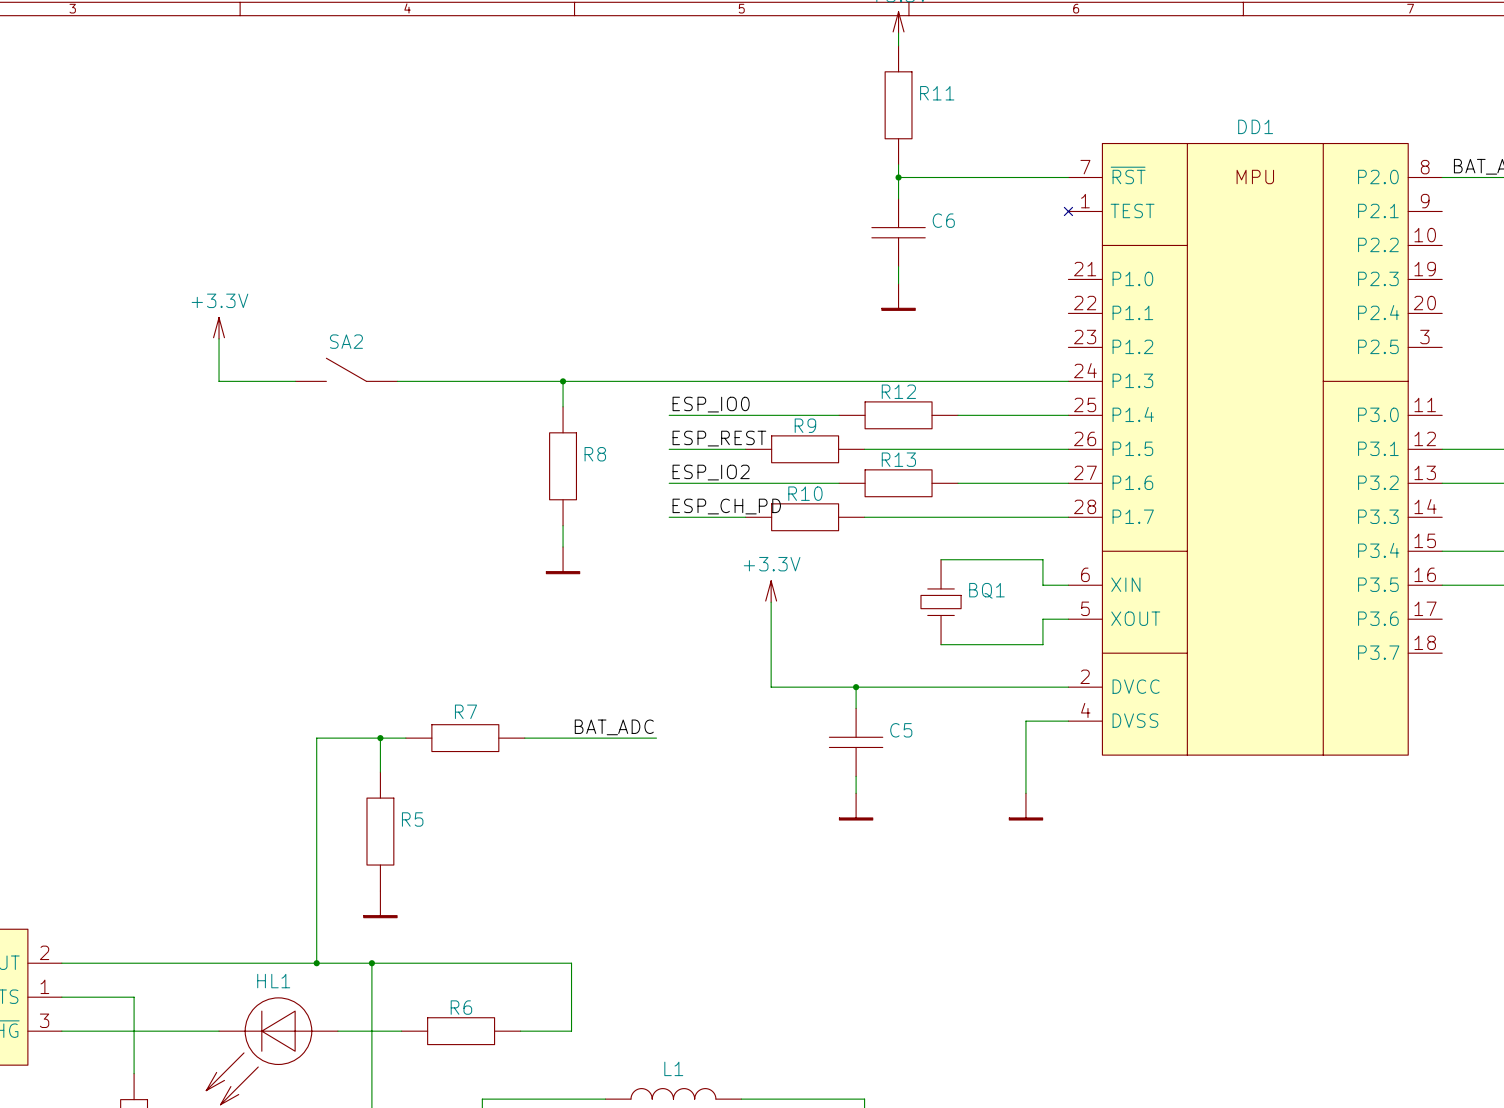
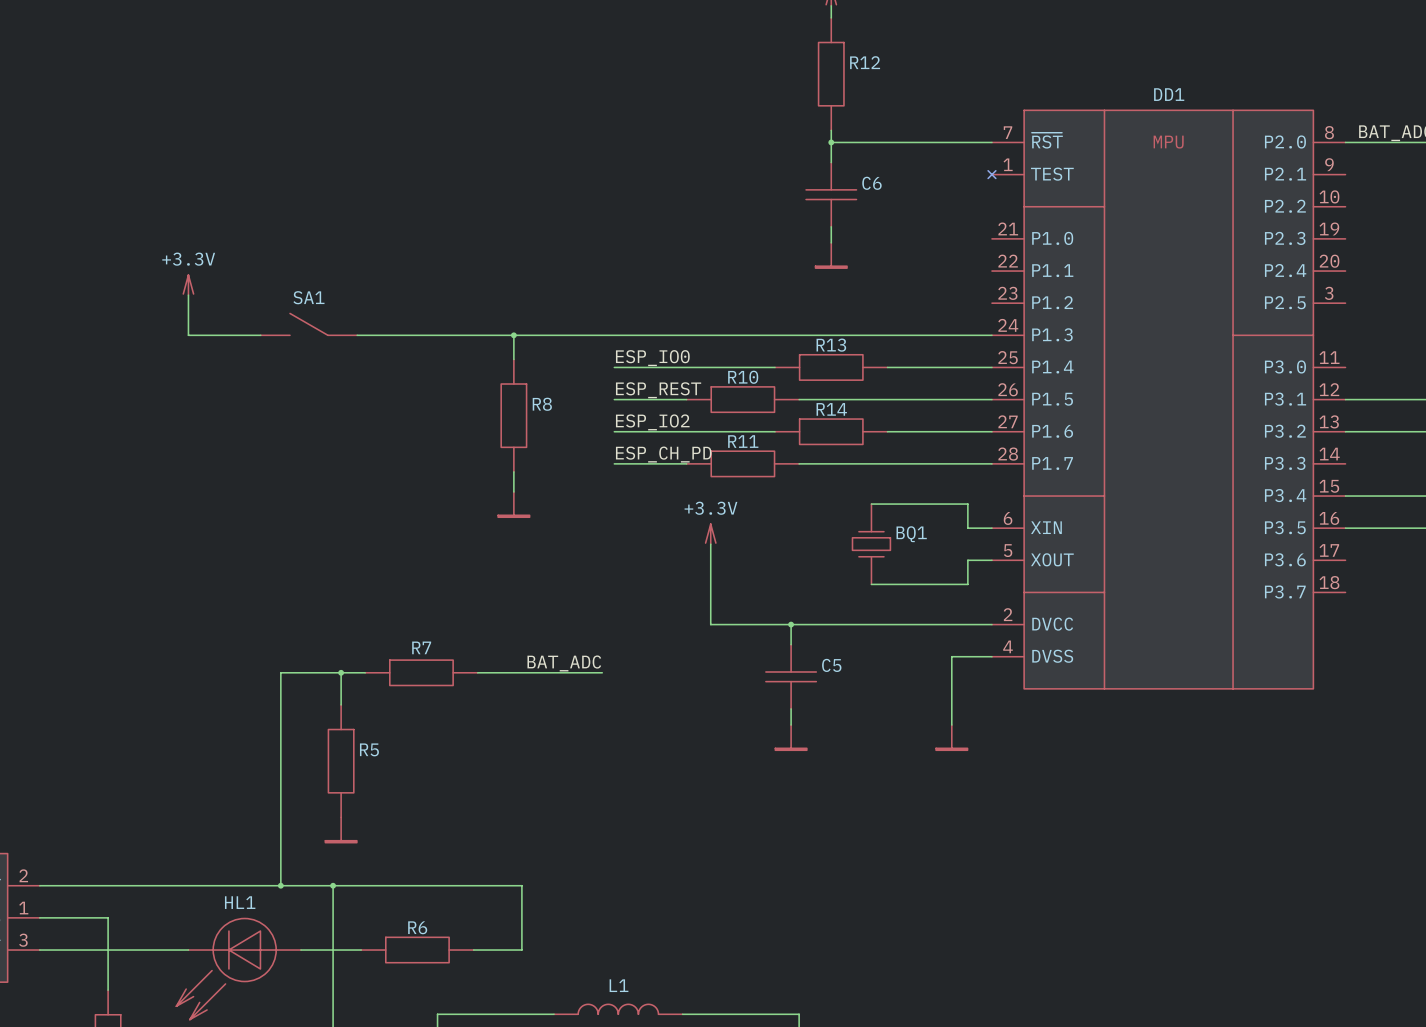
R11 name: R11 (937, 93) -> R12 (865, 62)
SA2 name: SA2 (346, 341) -> SA1 (308, 297)
R12 name: R12 (898, 391) -> R13 (831, 345)
R9 name: R9 (805, 425) -> R10 (743, 377)
R13 name: R13 (898, 459) -> R14 (831, 409)
R10 name: R10 (805, 493) -> R11 (743, 441)

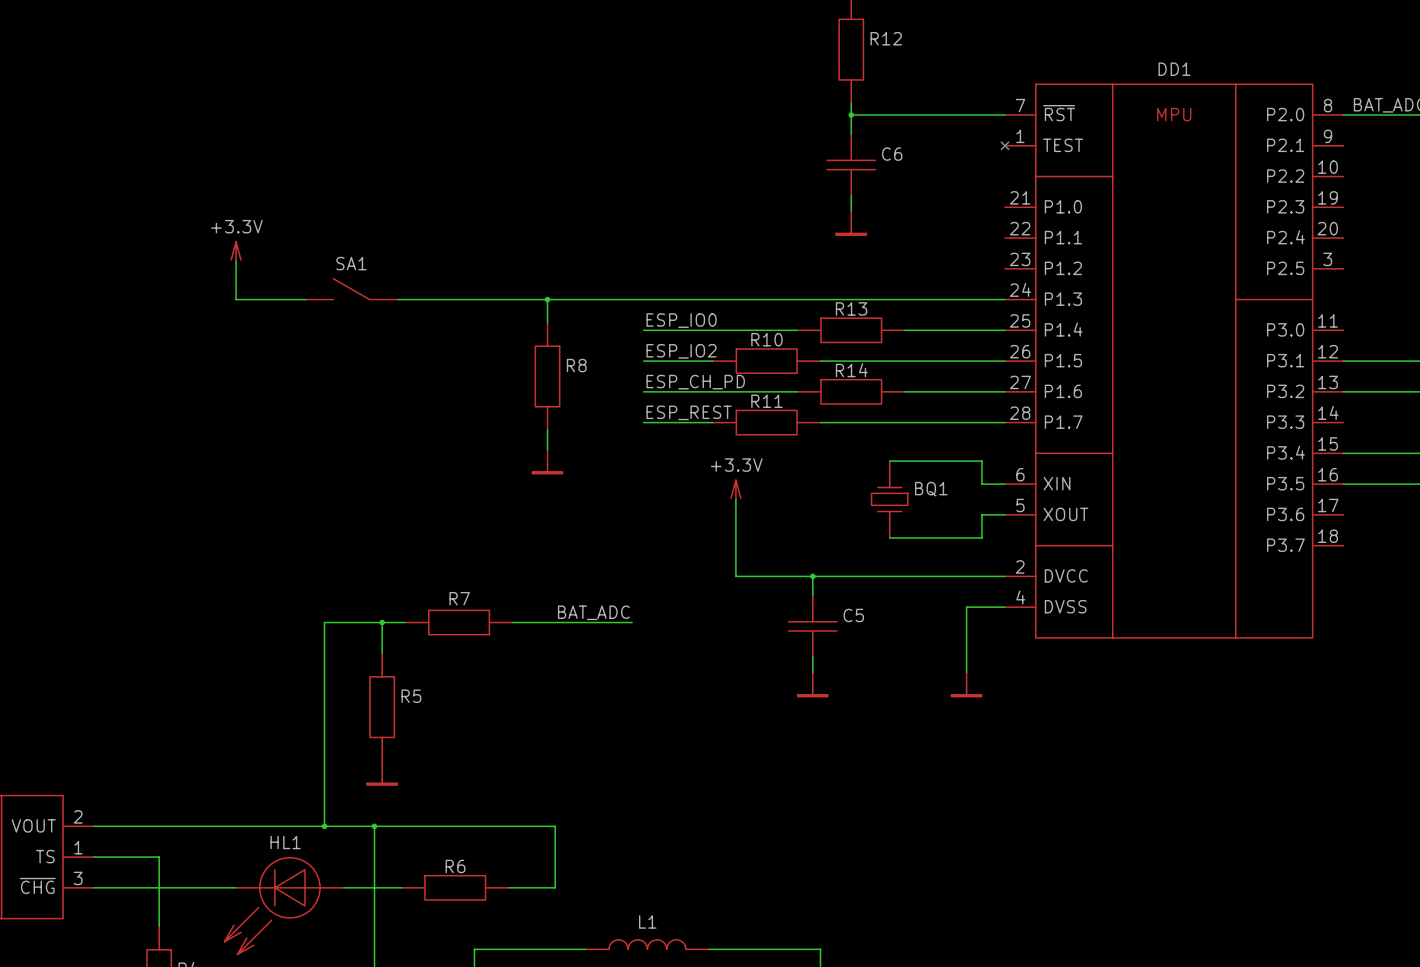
label: ESP_REST (658, 390) -> ESP_IO2 (681, 351)
label: ESP_IO2 (652, 422) -> ESP_CH_PD (695, 382)
label: ESP_CH_PD (663, 454) -> ESP_REST (689, 412)

